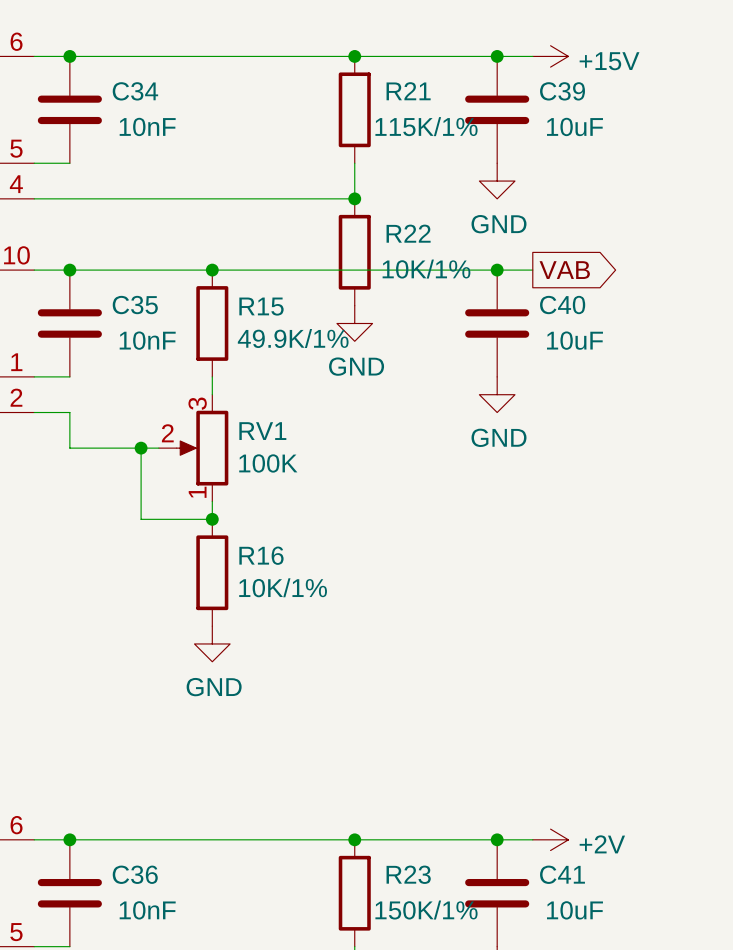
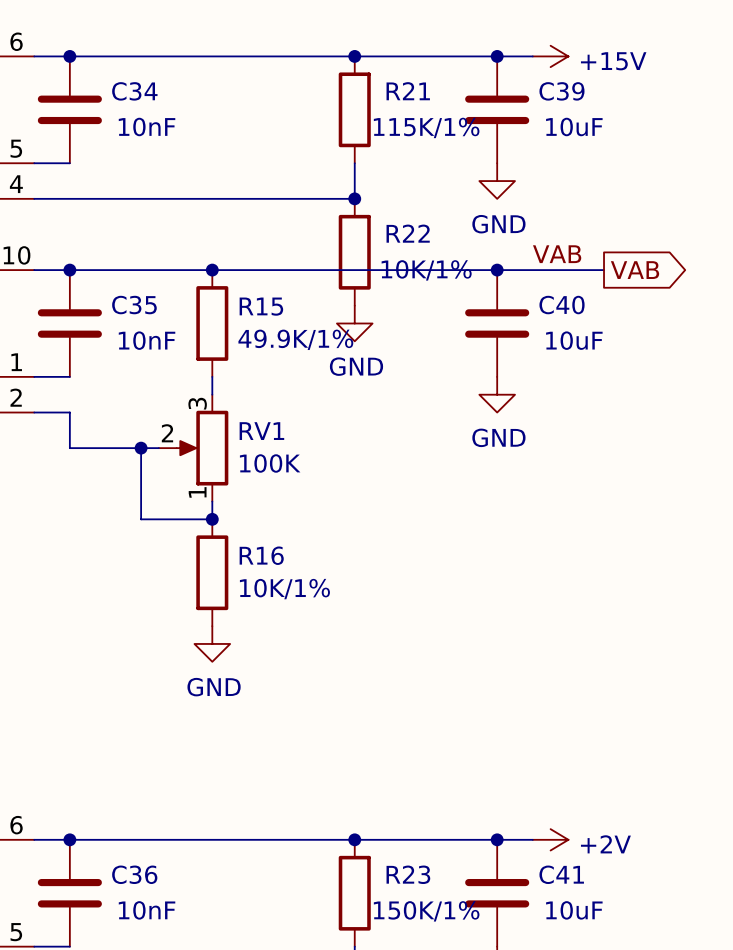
label: none -> VAB (557, 254)
wire: none -> (532, 270) (604, 270)
global label position: VAB (564, 270) -> VAB (635, 270)

